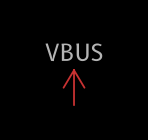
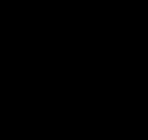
power symbol: VBUS (74, 87) -> none

